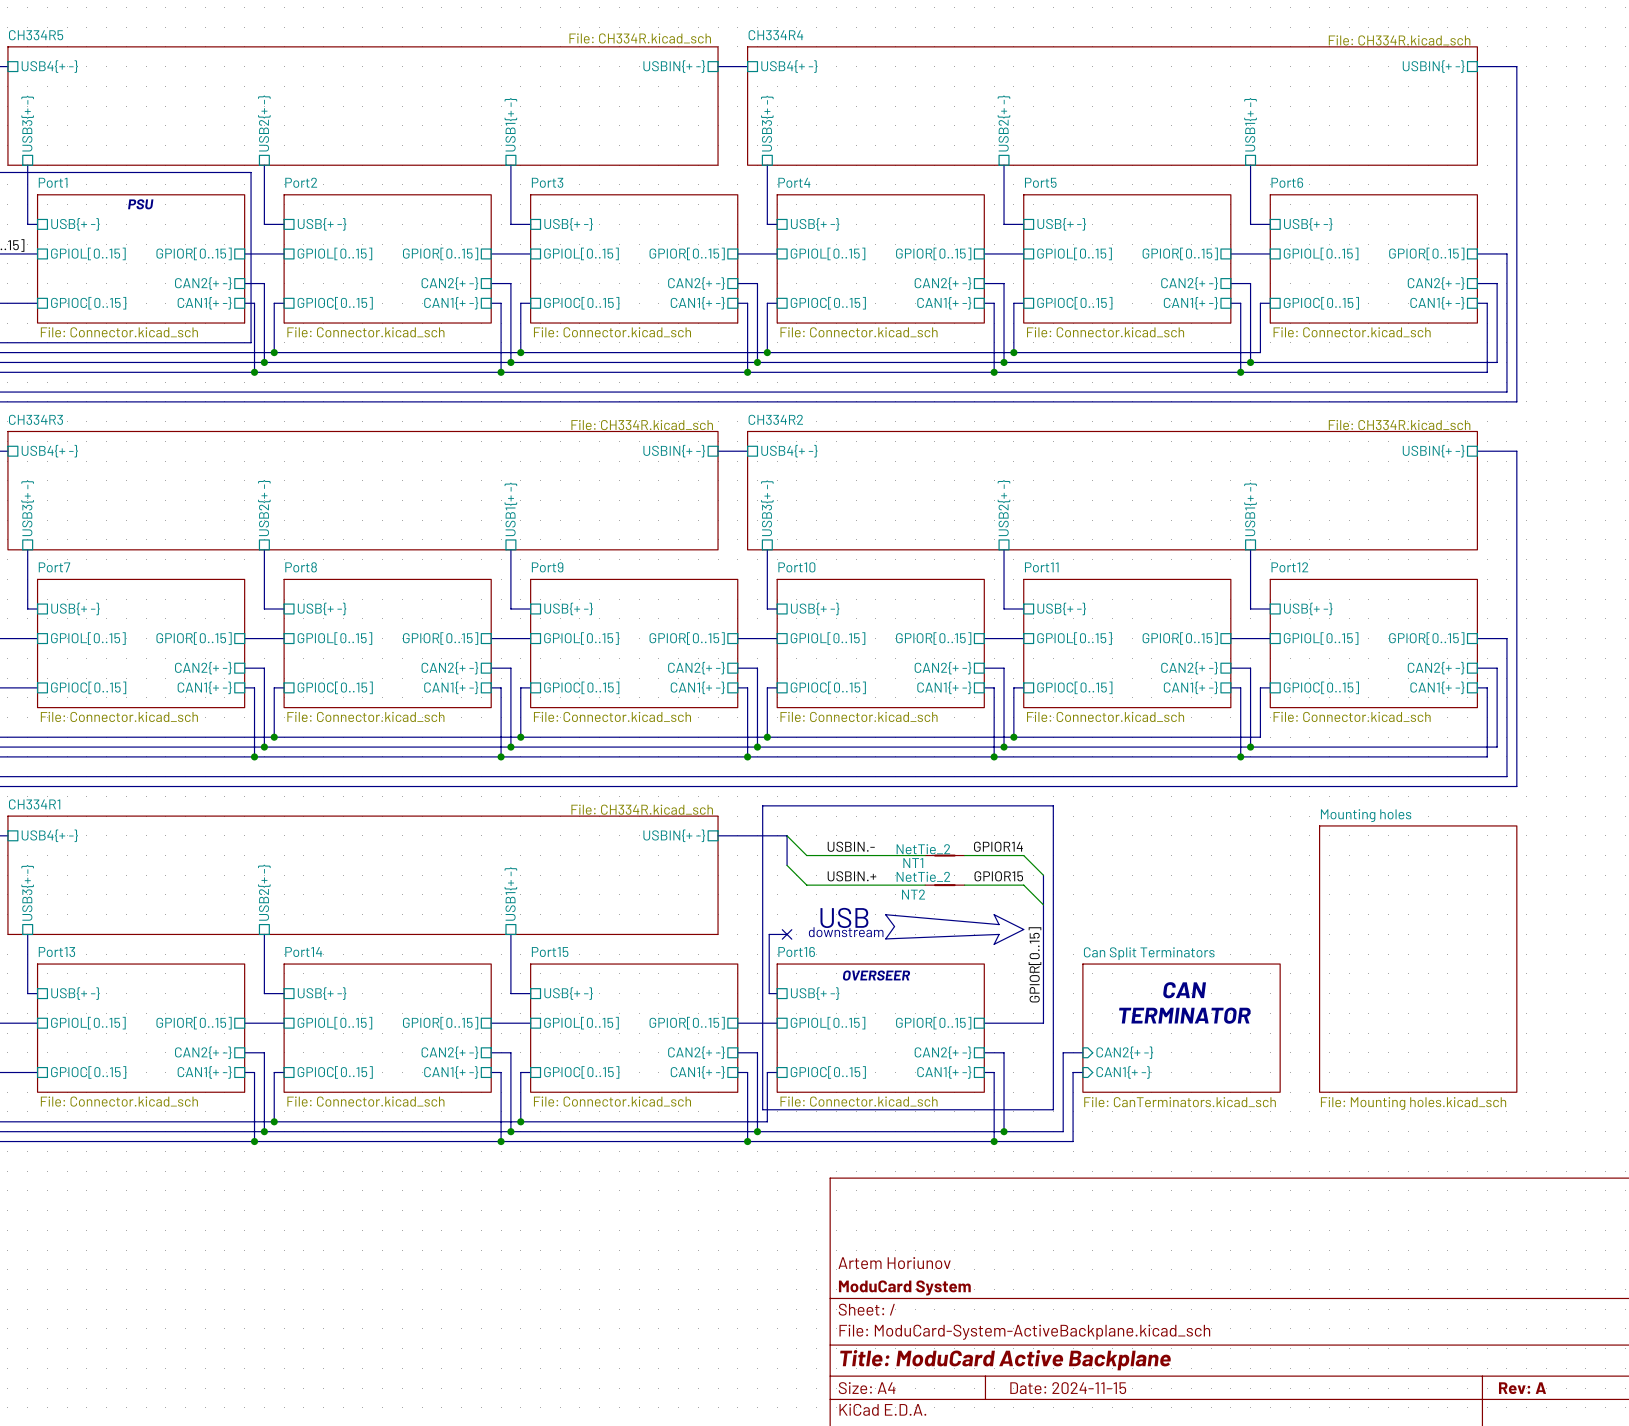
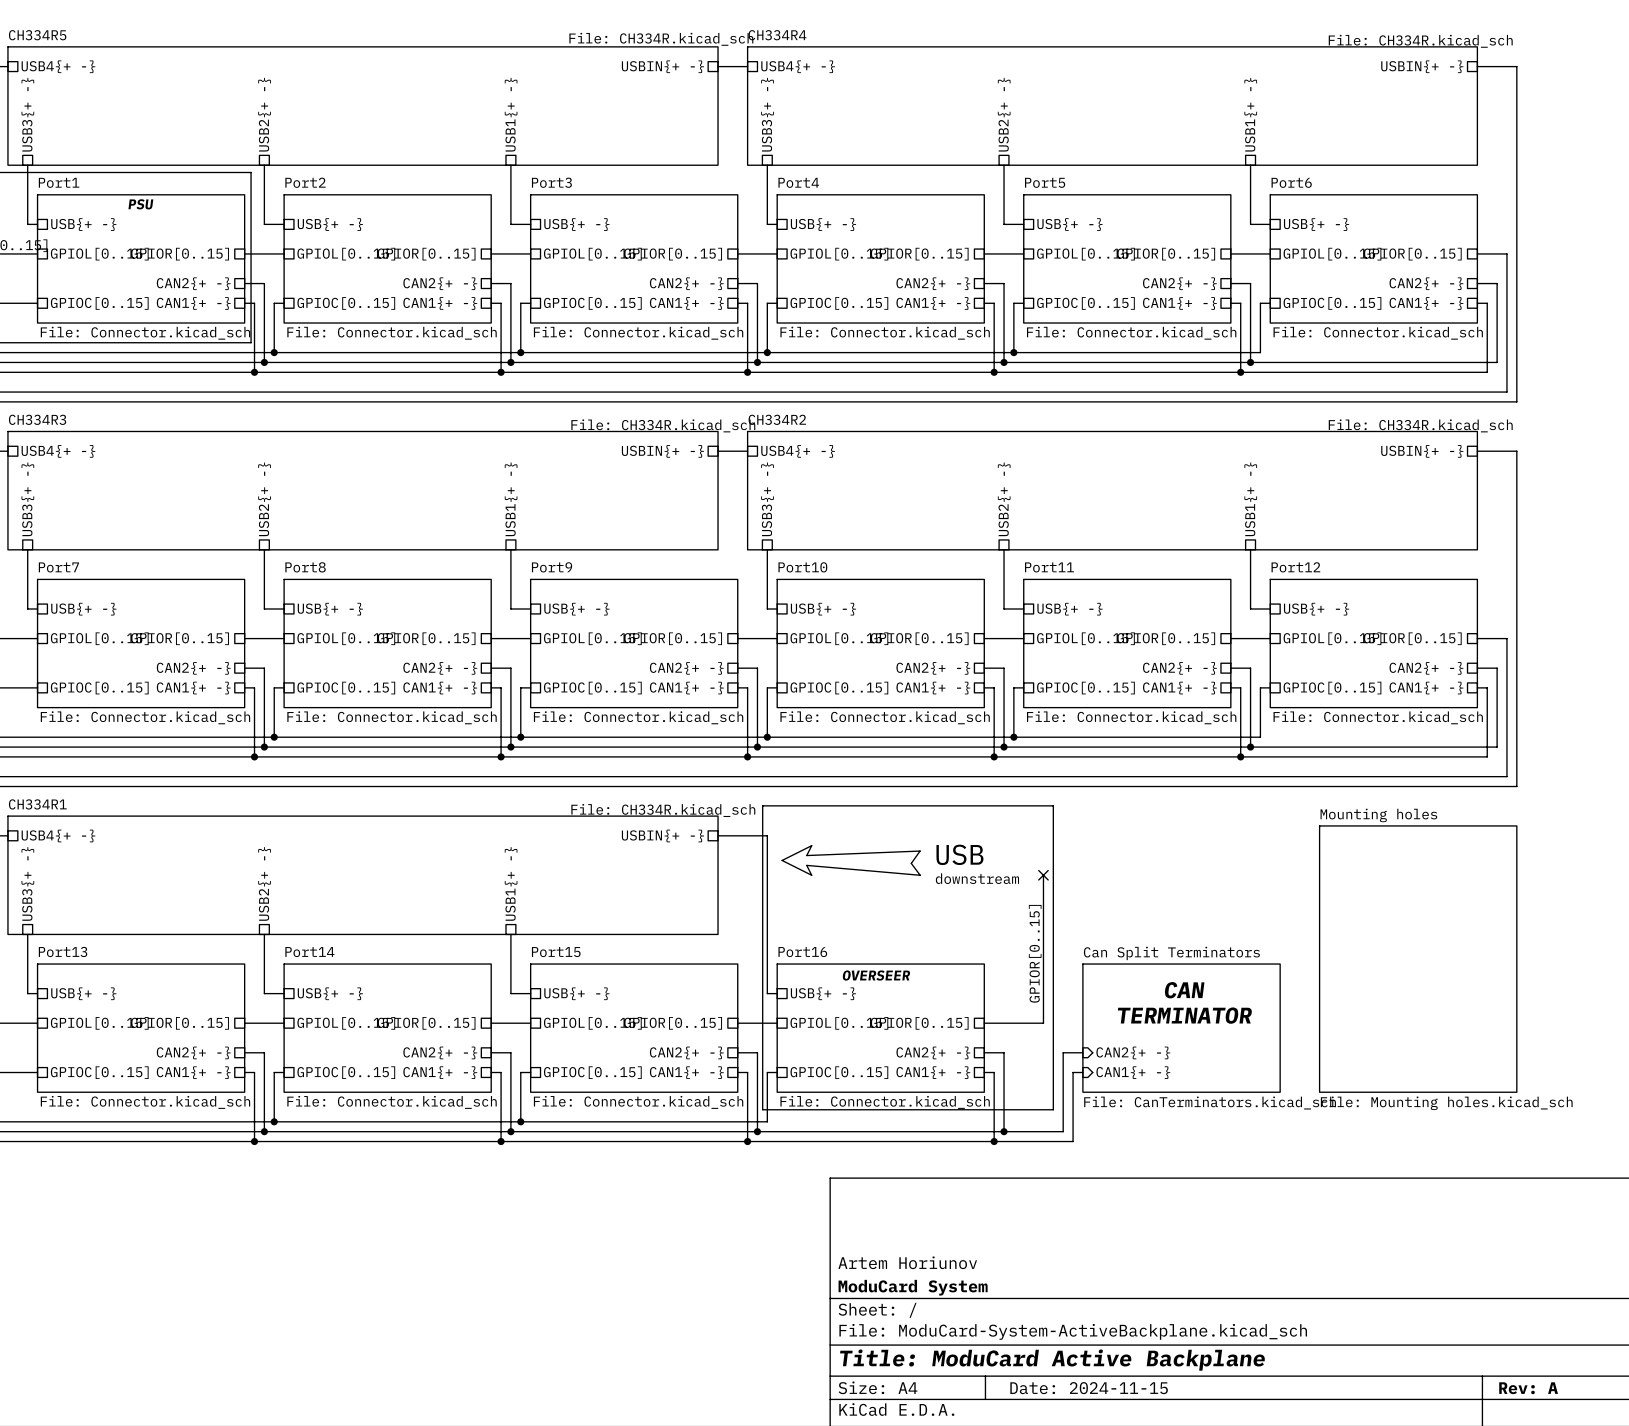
bus: (767, 835) (787, 835) (787, 865) -> none
wire: (787, 835) (806, 855) (925, 855) -> none
line: none -> (811, 845) (782, 860) (811, 875) (806, 865) (920, 875) (911, 863) (920, 851) (806, 855) (811, 845)
label: USBIN.- (851, 846) -> none
label: GPIOR14 (998, 846) -> none
NT1: NetTie_2 (944, 855) -> none
wire: (964, 855) (1023, 855) (1043, 875) -> none
wire: (787, 865) (806, 885) (925, 885) -> none
no-connect mark: none -> (1043, 875)
label: USBIN.+ (851, 876) -> none
label: GPIOR15 (998, 876) -> none
NT2: NetTie_2 (944, 885) -> none
wire: (964, 885) (1023, 885) (1043, 904) -> none
line: (885, 914) (894, 926) (885, 938) (999, 934) (994, 944) (1023, 929) (994, 914) (999, 924) (885, 914) -> none
text position: USB (844, 917) -> USB (959, 854)
text position: downstream (846, 932) -> downstream (977, 878)
bus: (787, 934) (769, 934) (769, 993) -> (767, 835) (767, 993) (769, 993)
no-connect mark: (787, 934) -> none

